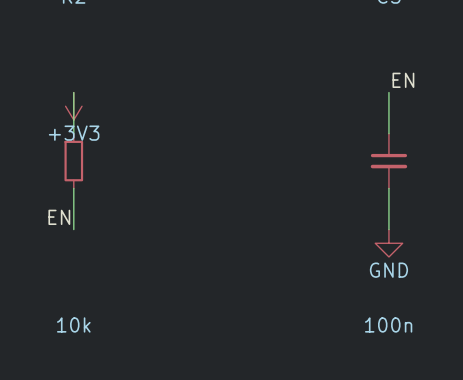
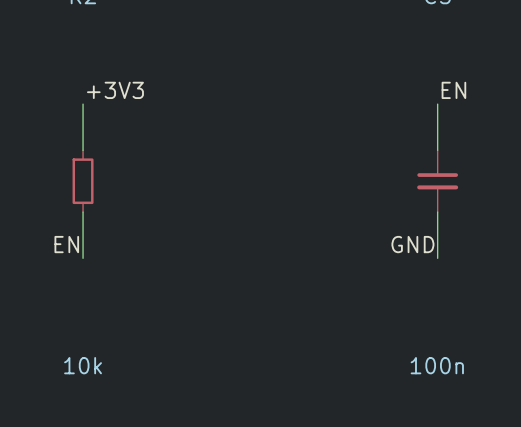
label: none -> +3V3 (115, 90)
power symbol: +3V3 (73, 106) -> none
label: none -> GND (412, 244)
power symbol: GND (388, 243) -> none

